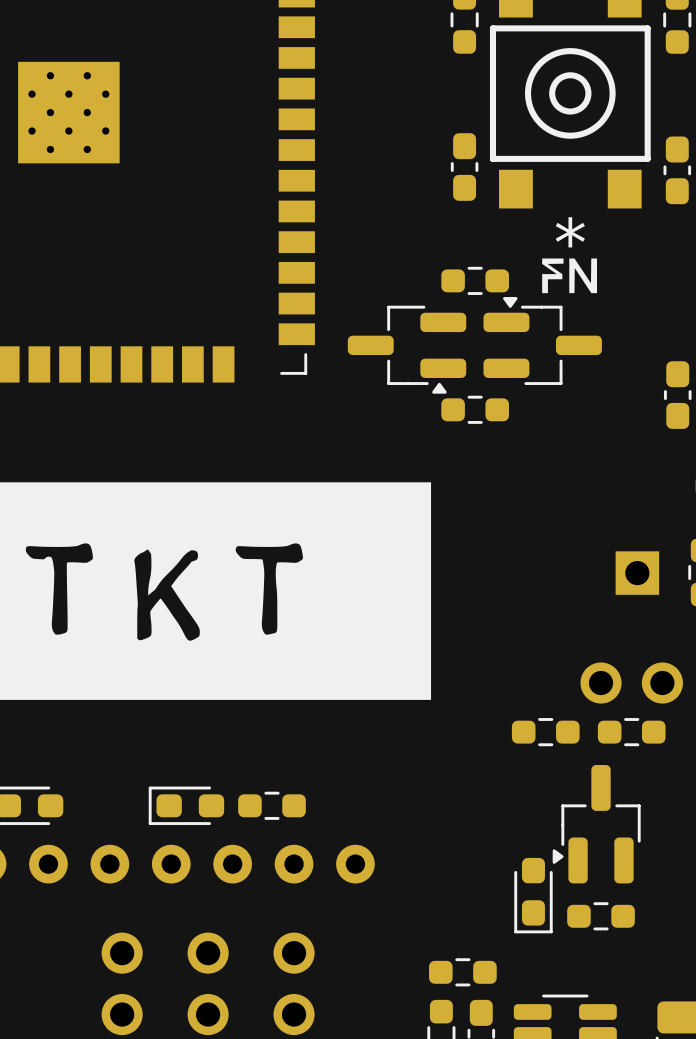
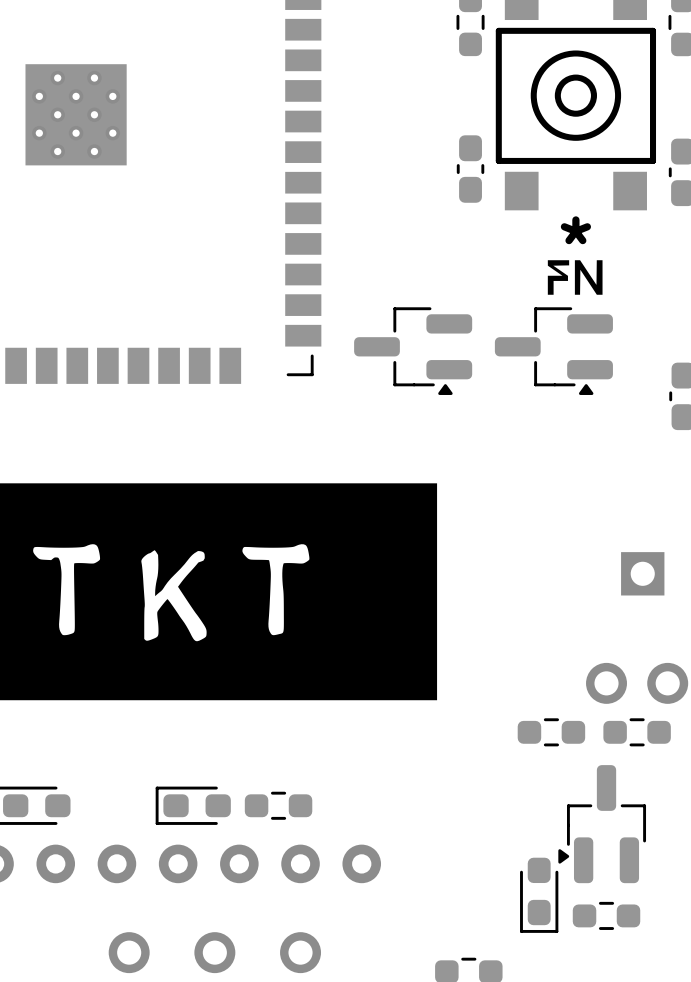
part: (475, 280) -> none
part rotation: 0° (542, 341) -> 180° (553, 351)
part: (475, 409) -> none

